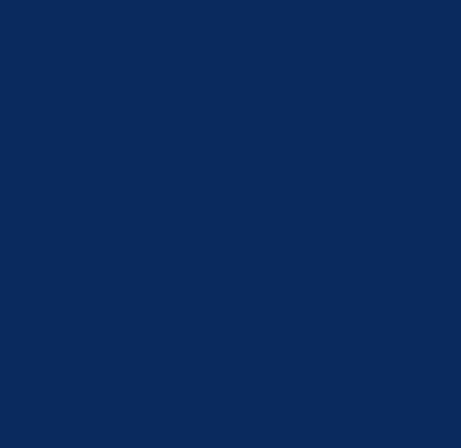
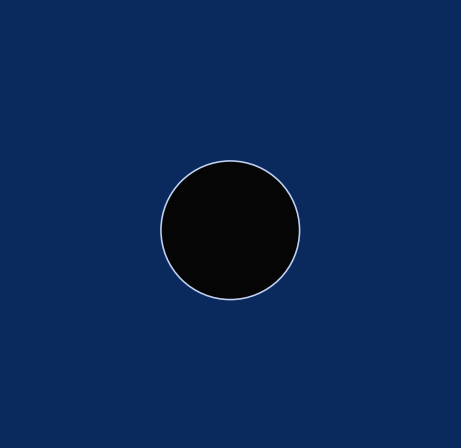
part: none -> (230, 230)

